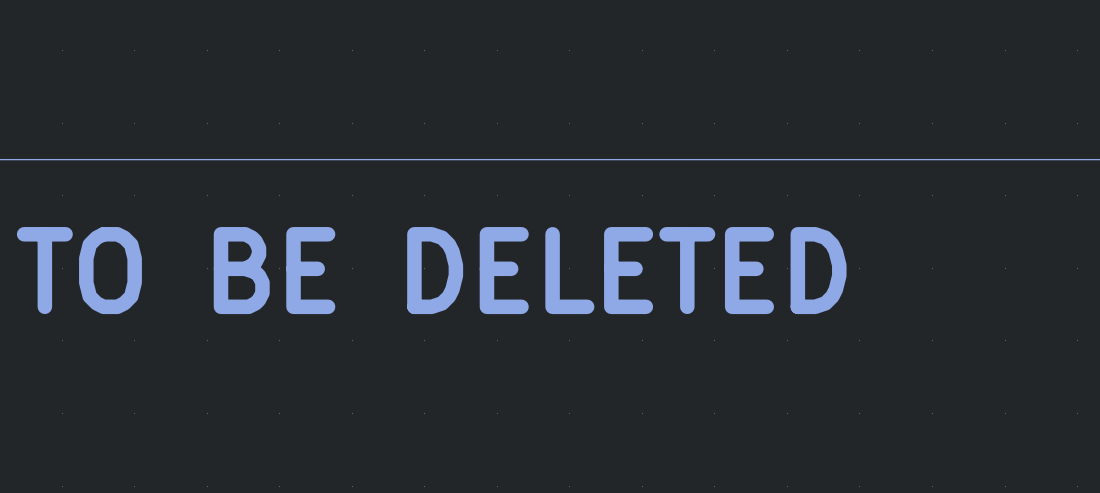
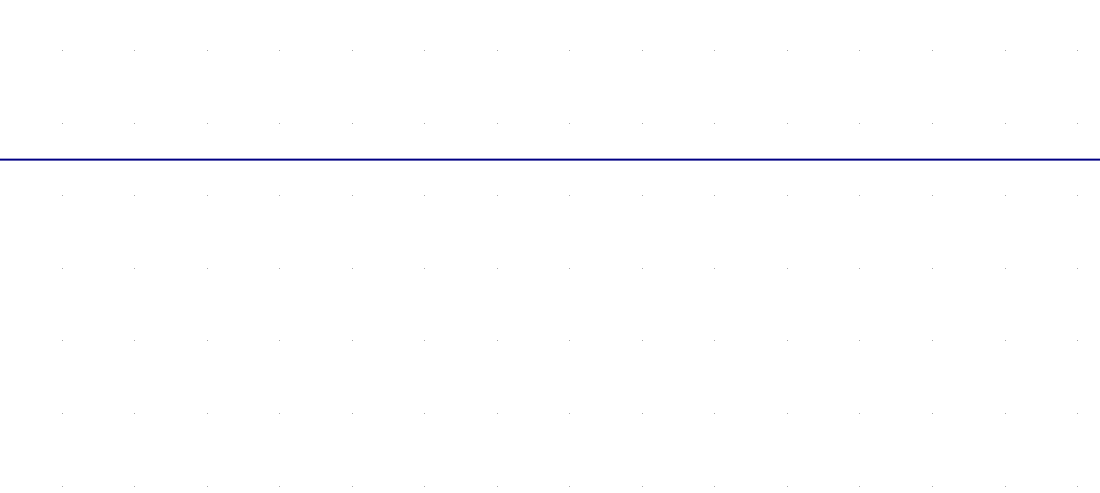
text: TO BE DELETED (431, 270) -> none

